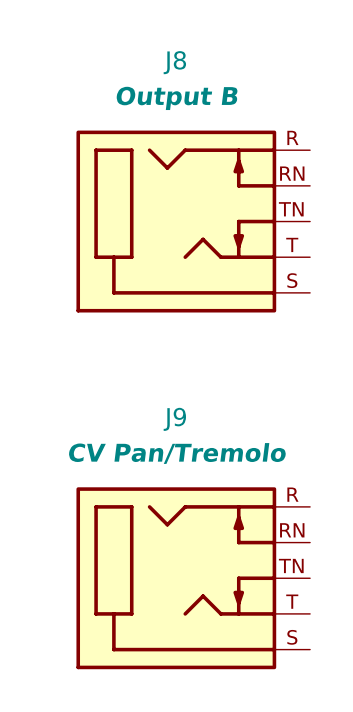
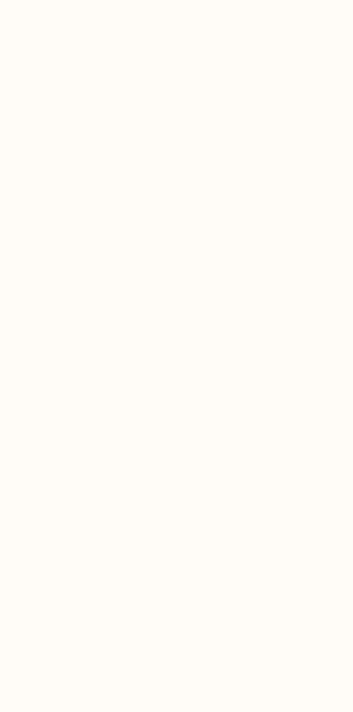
J8: (193, 221) -> none
J9: (193, 578) -> none

